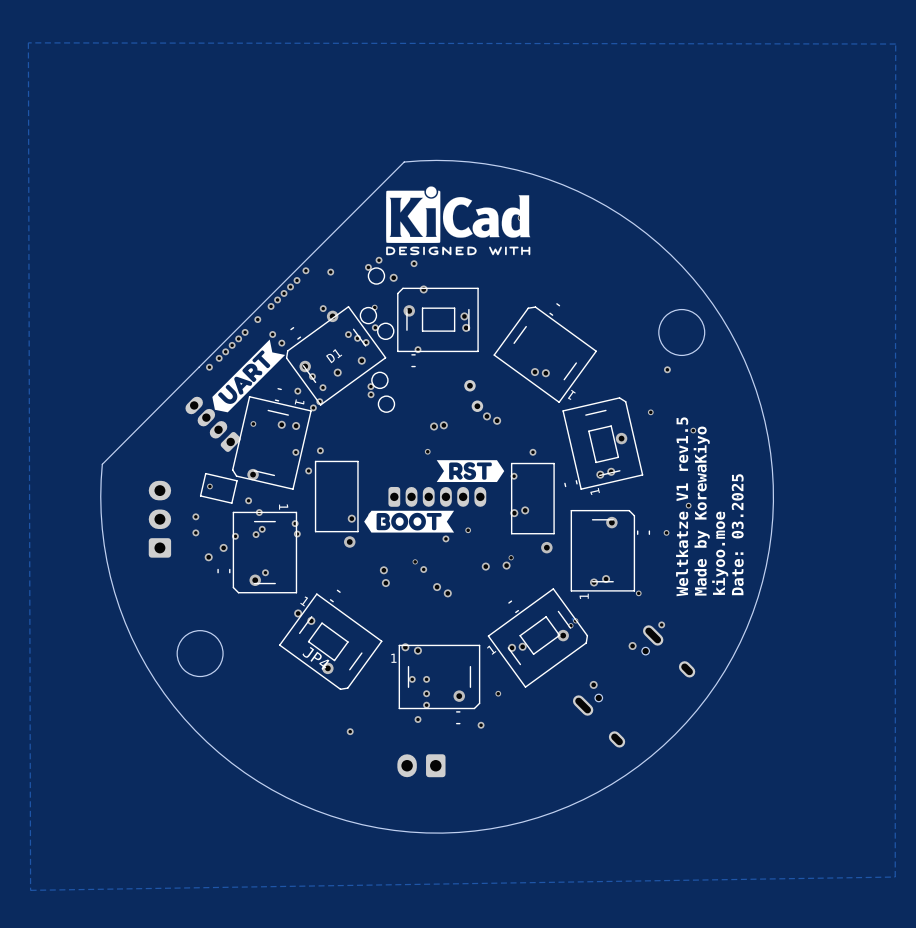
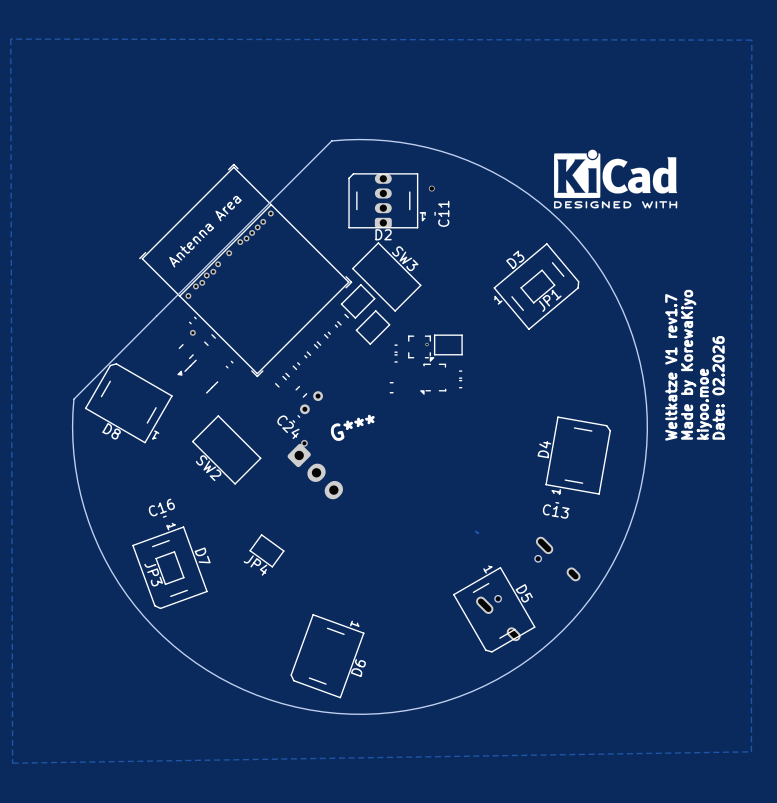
drawing position: (458, 220) -> (615, 179)
D2: none -> (383, 200)
part: none -> (383, 200)
via: none -> (270, 213)
C11: none -> (430, 213)
via: none -> (263, 221)
via: (379, 260) -> none
via: none -> (257, 227)
via: (414, 263) -> none
via: (368, 267) -> none
via: none -> (252, 232)
via: (305, 270) -> none
via: (330, 272) -> none
via: none -> (246, 238)
part: (376, 276) -> none
via: (393, 277) -> none
via: (290, 286) -> none
via: (423, 289) -> none
via: (277, 299) -> none
via: (374, 307) -> none
via: (323, 308) -> none
part: (554, 309) -> none
round board edge: [658, 309, 705, 356] -> none
via: (409, 310) -> none
part: none -> (245, 270)
via: none -> (213, 271)
part: (368, 315) -> none
via: (332, 316) -> none
via: (464, 316) -> none
part: (437, 319) -> none
part position: (438, 319) -> (448, 344)
SW3: none -> (386, 277)
via: (375, 327) -> none
via: (466, 327) -> none
via: none -> (202, 282)
part: (385, 331) -> none
D3: none -> (536, 286)
JP1: none -> (537, 286)
part: (295, 333) -> none
via: (272, 334) -> none
via: (348, 334) -> none
via: (238, 338) -> none
via: (357, 338) -> none
drawing: [212, 339, 286, 413] -> none
via: (366, 342) -> none
via: none -> (188, 296)
via: (281, 343) -> none
via: (232, 345) -> none
via: (417, 349) -> none
part: none -> (358, 301)
via: (225, 351) -> none
part footprint: [411, 354, 416, 368] -> [337, 313, 349, 326]
part: (545, 354) -> none
part: (336, 355) -> none
via: (219, 358) -> none
via: (361, 360) -> none
via: (305, 366) -> none
via: (209, 367) -> none
via: (667, 369) -> none
part: none -> (192, 320)
via: (337, 372) -> none
via: (534, 372) -> none
via: (545, 373) -> none
via: (312, 376) -> none
part: (379, 380) -> none
part: none -> (373, 327)
part: none -> (332, 329)
via: none -> (192, 332)
via: (370, 386) -> none
via: (322, 387) -> none
via: (297, 391) -> none
part: (278, 394) -> none
via: (371, 394) -> none
part: none -> (322, 339)
part: none -> (210, 340)
part footprint: [377, 395, 396, 413] -> [306, 344, 319, 356]
part: (473, 396) -> none
via: none -> (427, 344)
via: (319, 401) -> none
part: none -> (396, 348)
part: none -> (421, 348)
via: (313, 407) -> none
part: none -> (186, 351)
via: (650, 412) -> none
part: none -> (396, 358)
via: (486, 416) -> none
part: none -> (302, 360)
via: (497, 420) -> none
via: (253, 423) -> none
part: none -> (229, 364)
part: (213, 424) -> none
via: (281, 424) -> none
via: (296, 425) -> none
via: (443, 425) -> none
text: none -> Weltkatze V1 rev1.7 (671, 367)
via: (434, 426) -> none
via: (693, 430) -> none
part: none -> (291, 371)
part: none -> (460, 374)
part: none -> (197, 376)
via: (621, 438) -> none
part: none -> (433, 379)
part: (271, 442) -> none
part: none -> (280, 381)
part: (602, 443) -> none
part: (603, 444) -> none
part: none -> (460, 384)
via: (320, 450) -> none
part: none -> (391, 387)
via: (427, 451) -> none
via: (295, 452) -> none
via: (532, 452) -> none
text: none -> Date: 02.2026 (718, 387)
part: none -> (301, 391)
drawing: [436, 460, 505, 483] -> none
part: none -> (311, 402)
D8: none -> (128, 403)
via: (308, 470) -> none
via: (611, 471) -> none
via: (253, 474) -> none
via: (600, 474) -> none
via: (514, 476) -> none
part: (570, 483) -> none
via: (209, 486) -> none
C24: none -> (296, 418)
part: (218, 488) -> none
part: (336, 496) -> none
part: (437, 496) -> none
G***: none -> (352, 427)
part: (532, 498) -> none
via: (248, 500) -> none
via: (688, 505) -> none
text: Weltkatze V1 rev1.5 (682, 506) -> none
drawing: [364, 510, 455, 533] -> none
via: (525, 510) -> none
text position: Made by KorewaKiyo (701, 511) -> Made by KorewaKiyo (688, 364)
via: (259, 512) -> none
via: (514, 513) -> none
via: (195, 516) -> none
via: (351, 518) -> none
part: (159, 519) -> none
via: (611, 522) -> none
SW2: none -> (226, 449)
via: (295, 523) -> none
via: (262, 529) -> none
via: (468, 530) -> none
D4: none -> (578, 455)
via: (195, 532) -> none
part: (643, 532) -> none
via: (666, 532) -> none
via: (256, 534) -> none
via: (297, 534) -> none
text: Date: 03.2025 (737, 534) -> none
via: (235, 536) -> none
via: (445, 538) -> none
via: (349, 541) -> none
via: (223, 547) -> none
via: (546, 547) -> none
part: none -> (315, 471)
part: (602, 550) -> none
part: (264, 552) -> none
text position: kiyoo.moe (720, 553) -> kiyoo.moe (704, 404)
via: (208, 557) -> none
via: (511, 557) -> none
via: (415, 561) -> none
via: (506, 565) -> none
via: (485, 566) -> none
via: (423, 569) -> none
via: (383, 570) -> none
part: (223, 571) -> none
via: (265, 572) -> none
via: (606, 579) -> none
C13: none -> (558, 497)
via: (255, 580) -> none
via: (594, 582) -> none
via: (385, 583) -> none
via: (437, 587) -> none
via: (447, 593) -> none
via: (638, 593) -> none
part: (335, 596) -> none
part: (513, 606) -> none
C16: none -> (166, 521)
via: (298, 613) -> none
via: (311, 620) -> none
via: (575, 620) -> none
via: (661, 624) -> none
via: (570, 625) -> none
round board edge: [176, 630, 224, 677] -> none
part: (539, 635) -> none
via: (563, 635) -> none
part: (537, 638) -> none
part: (330, 641) -> none
via: (522, 646) -> none
via: (632, 646) -> none
via: (405, 647) -> none
via: (512, 647) -> none
via: (417, 650) -> none
D7: none -> (169, 567)
JP3: none -> (169, 568)
via: (327, 668) -> none
part: (439, 676) -> none
via: (412, 679) -> none
via: (426, 679) -> none
via: (593, 684) -> none
via: (426, 693) -> none
via: (498, 693) -> none
via: (459, 696) -> none
via: (426, 705) -> none
D5: none -> (494, 609)
part: (458, 717) -> none
via: (417, 719) -> none
via: (481, 725) -> none
via: (350, 731) -> none
D6: none -> (327, 656)
part: (421, 765) -> none

